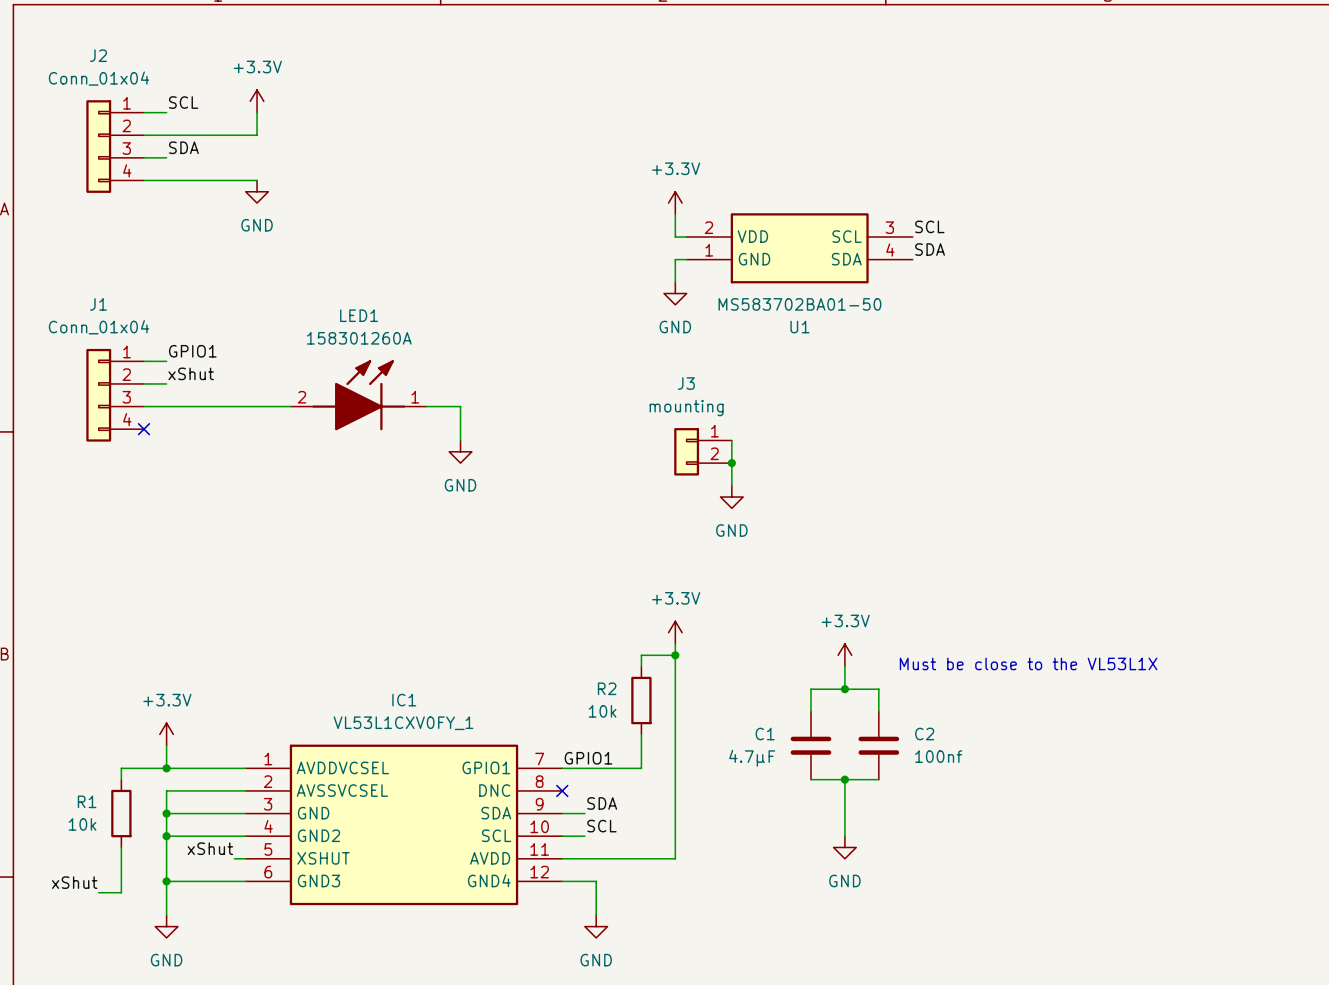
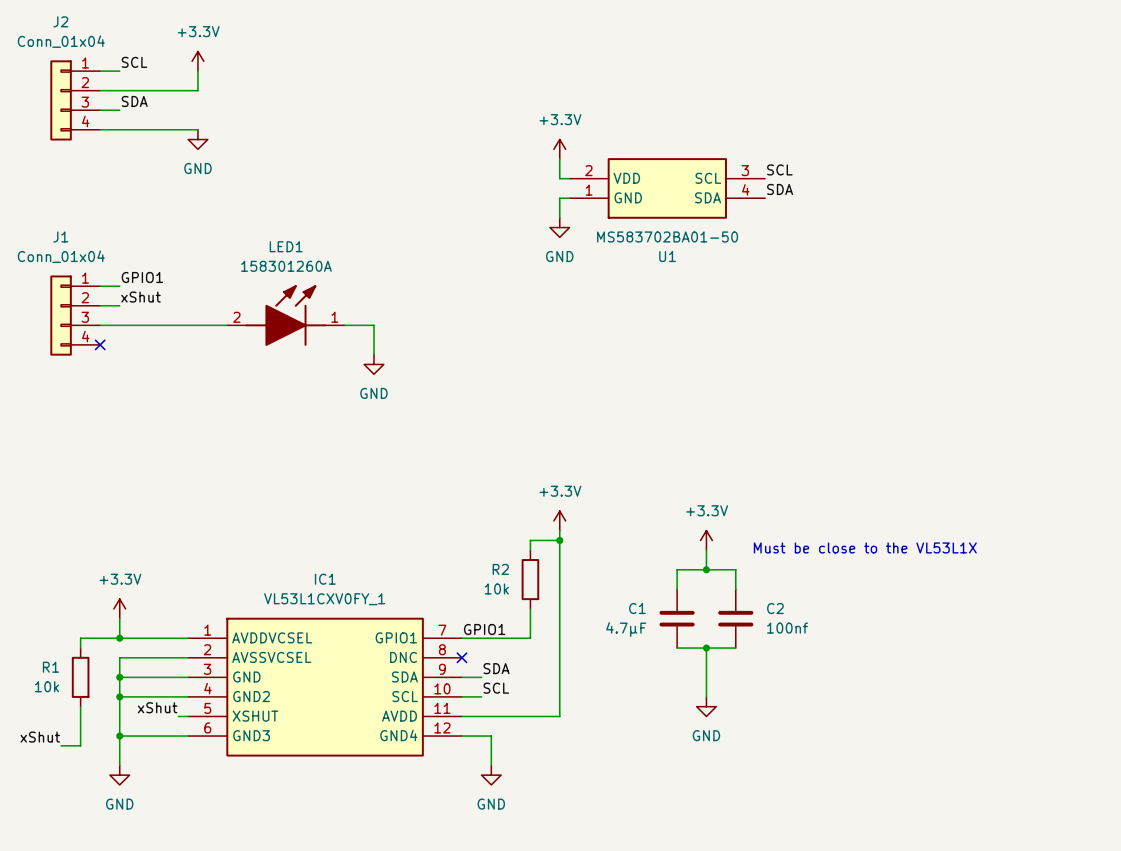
wire: (731, 440) (731, 485) -> none
J3: mounting (703, 451) -> none
junction: (731, 463) -> none
power symbol: GND (731, 497) -> none

